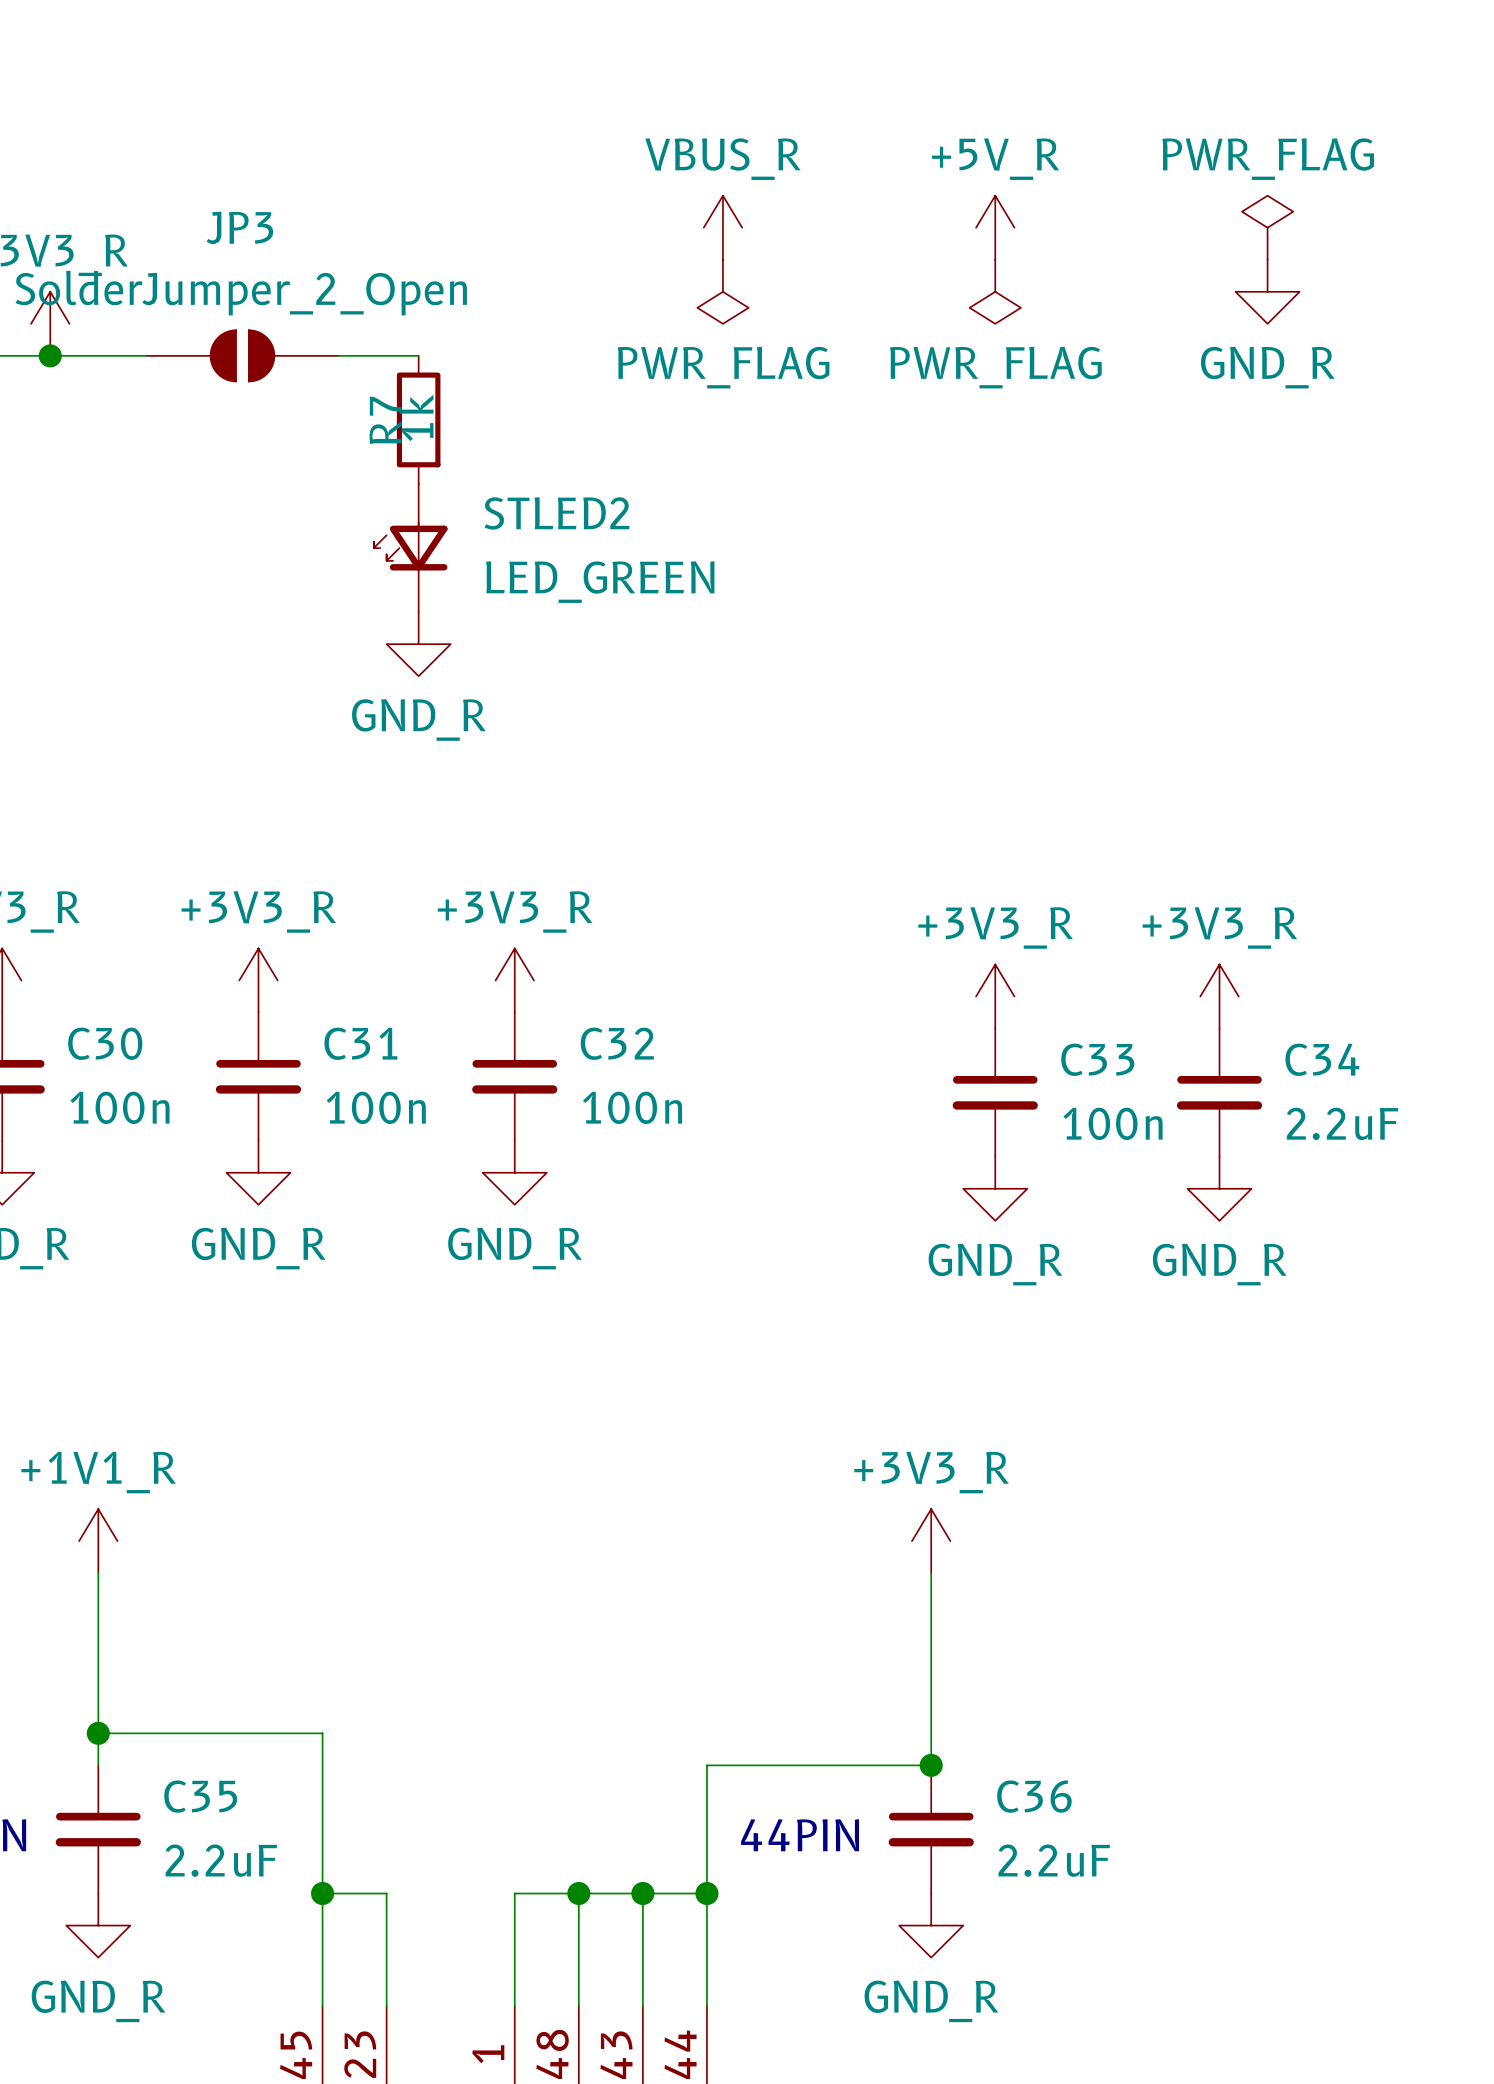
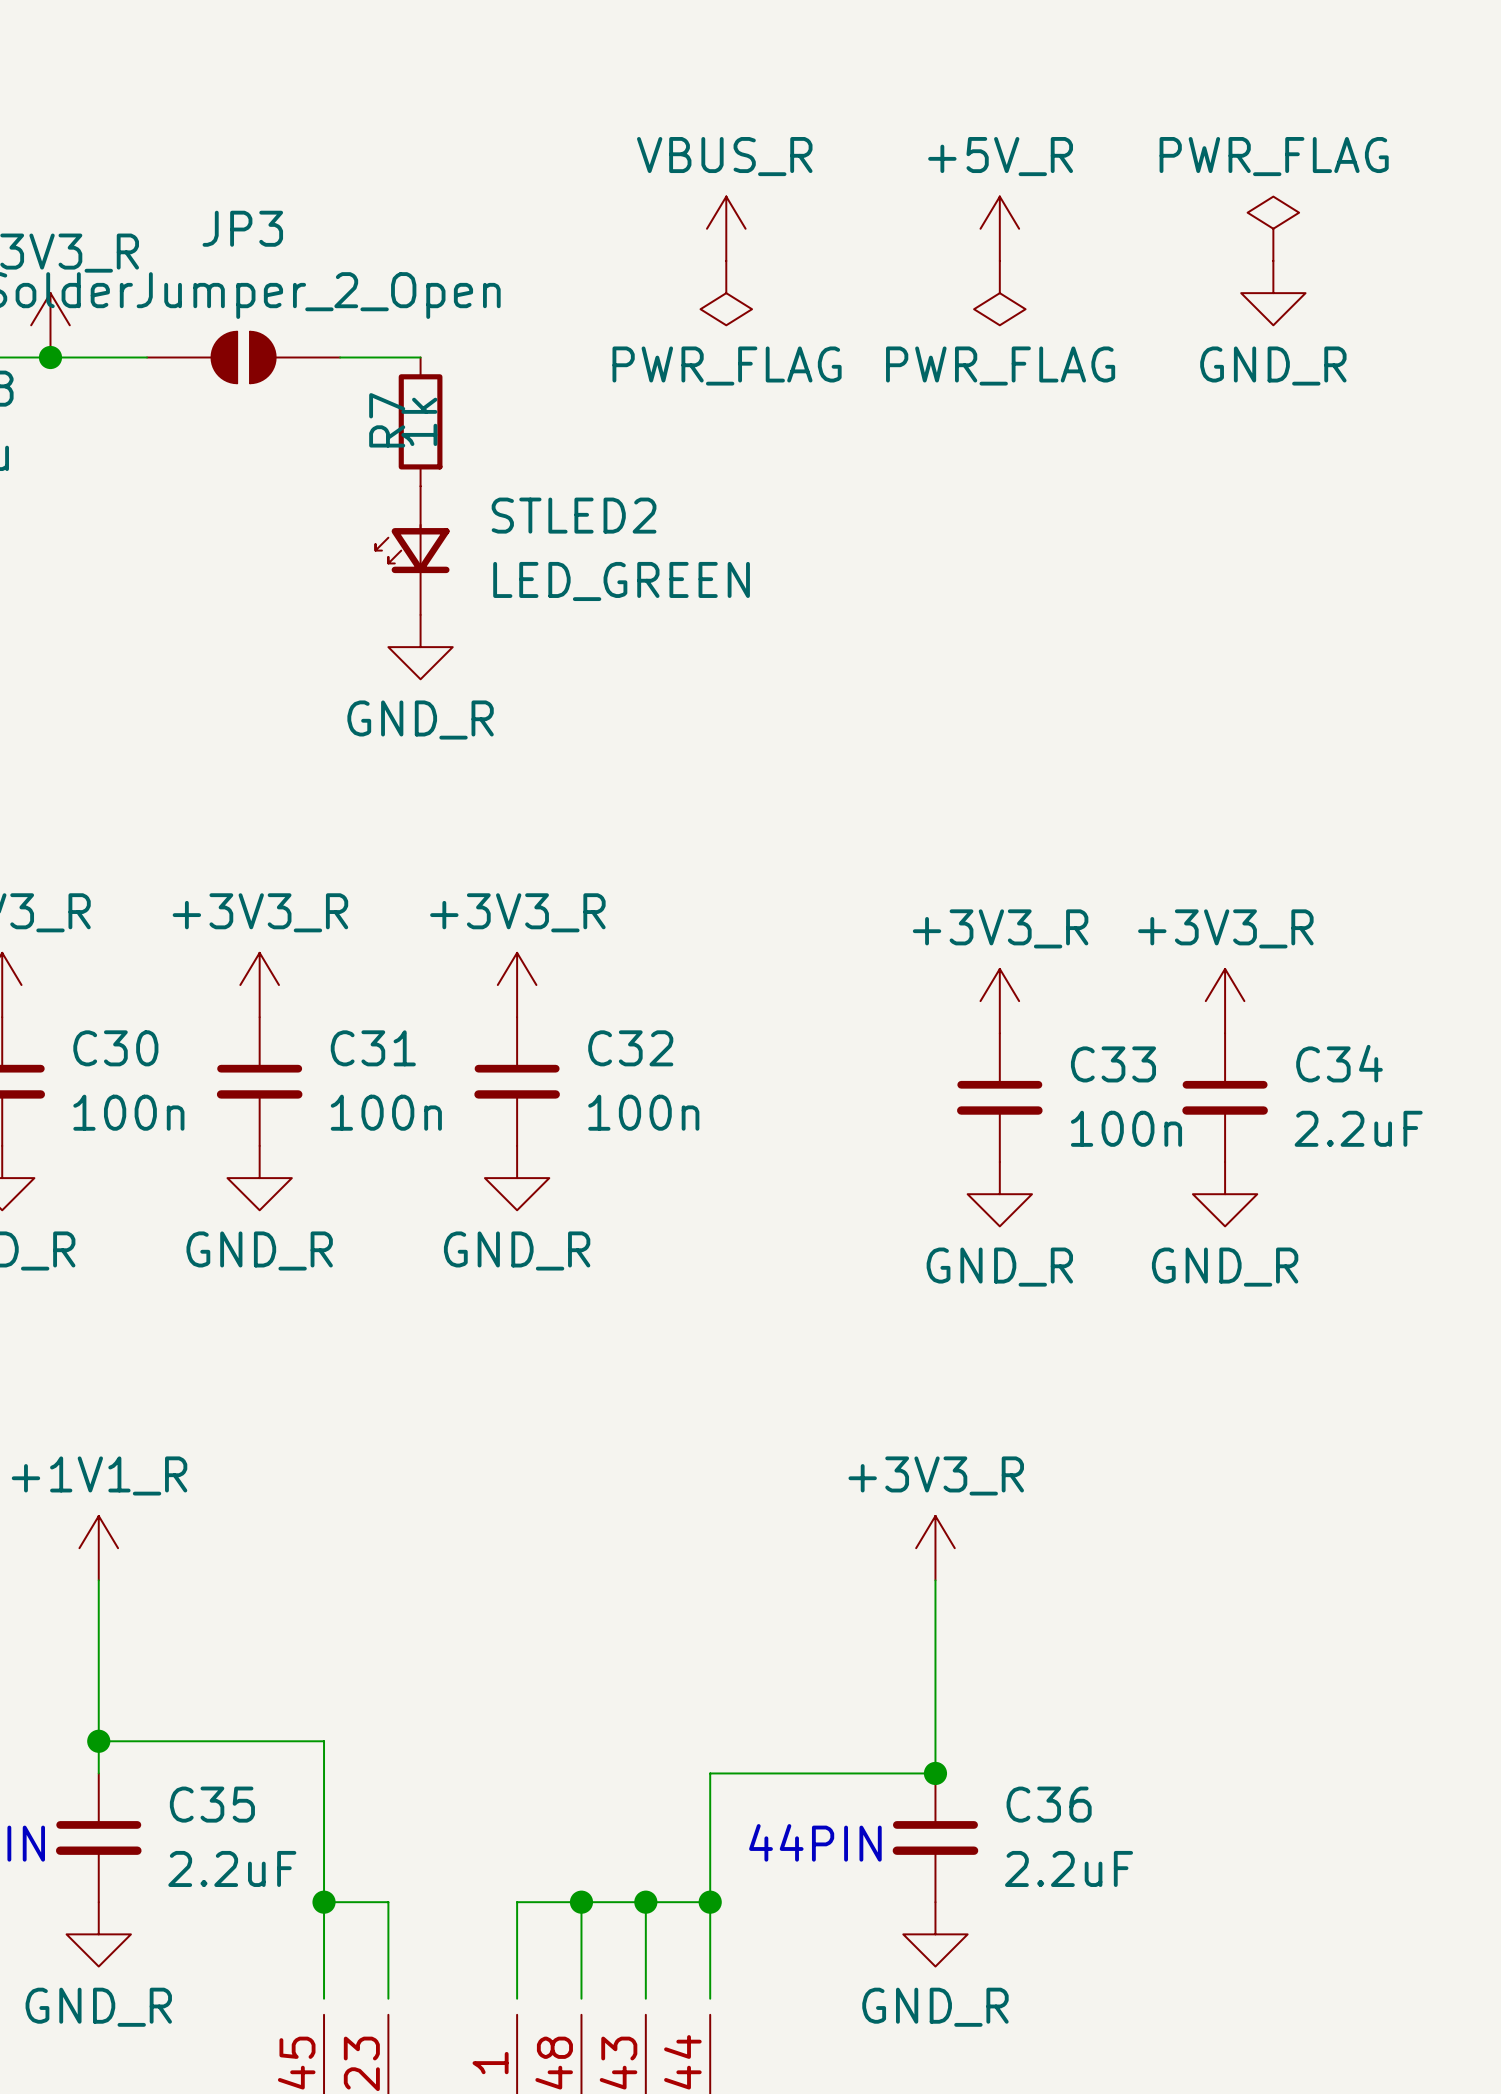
wire: (322, 1989) (322, 2005) -> none
wire: (386, 1989) (386, 2005) -> none
wire: (514, 1989) (514, 2005) -> none
wire: (578, 1989) (578, 2005) -> none
wire: (642, 1989) (642, 2005) -> none
wire: (706, 1989) (706, 2005) -> none

